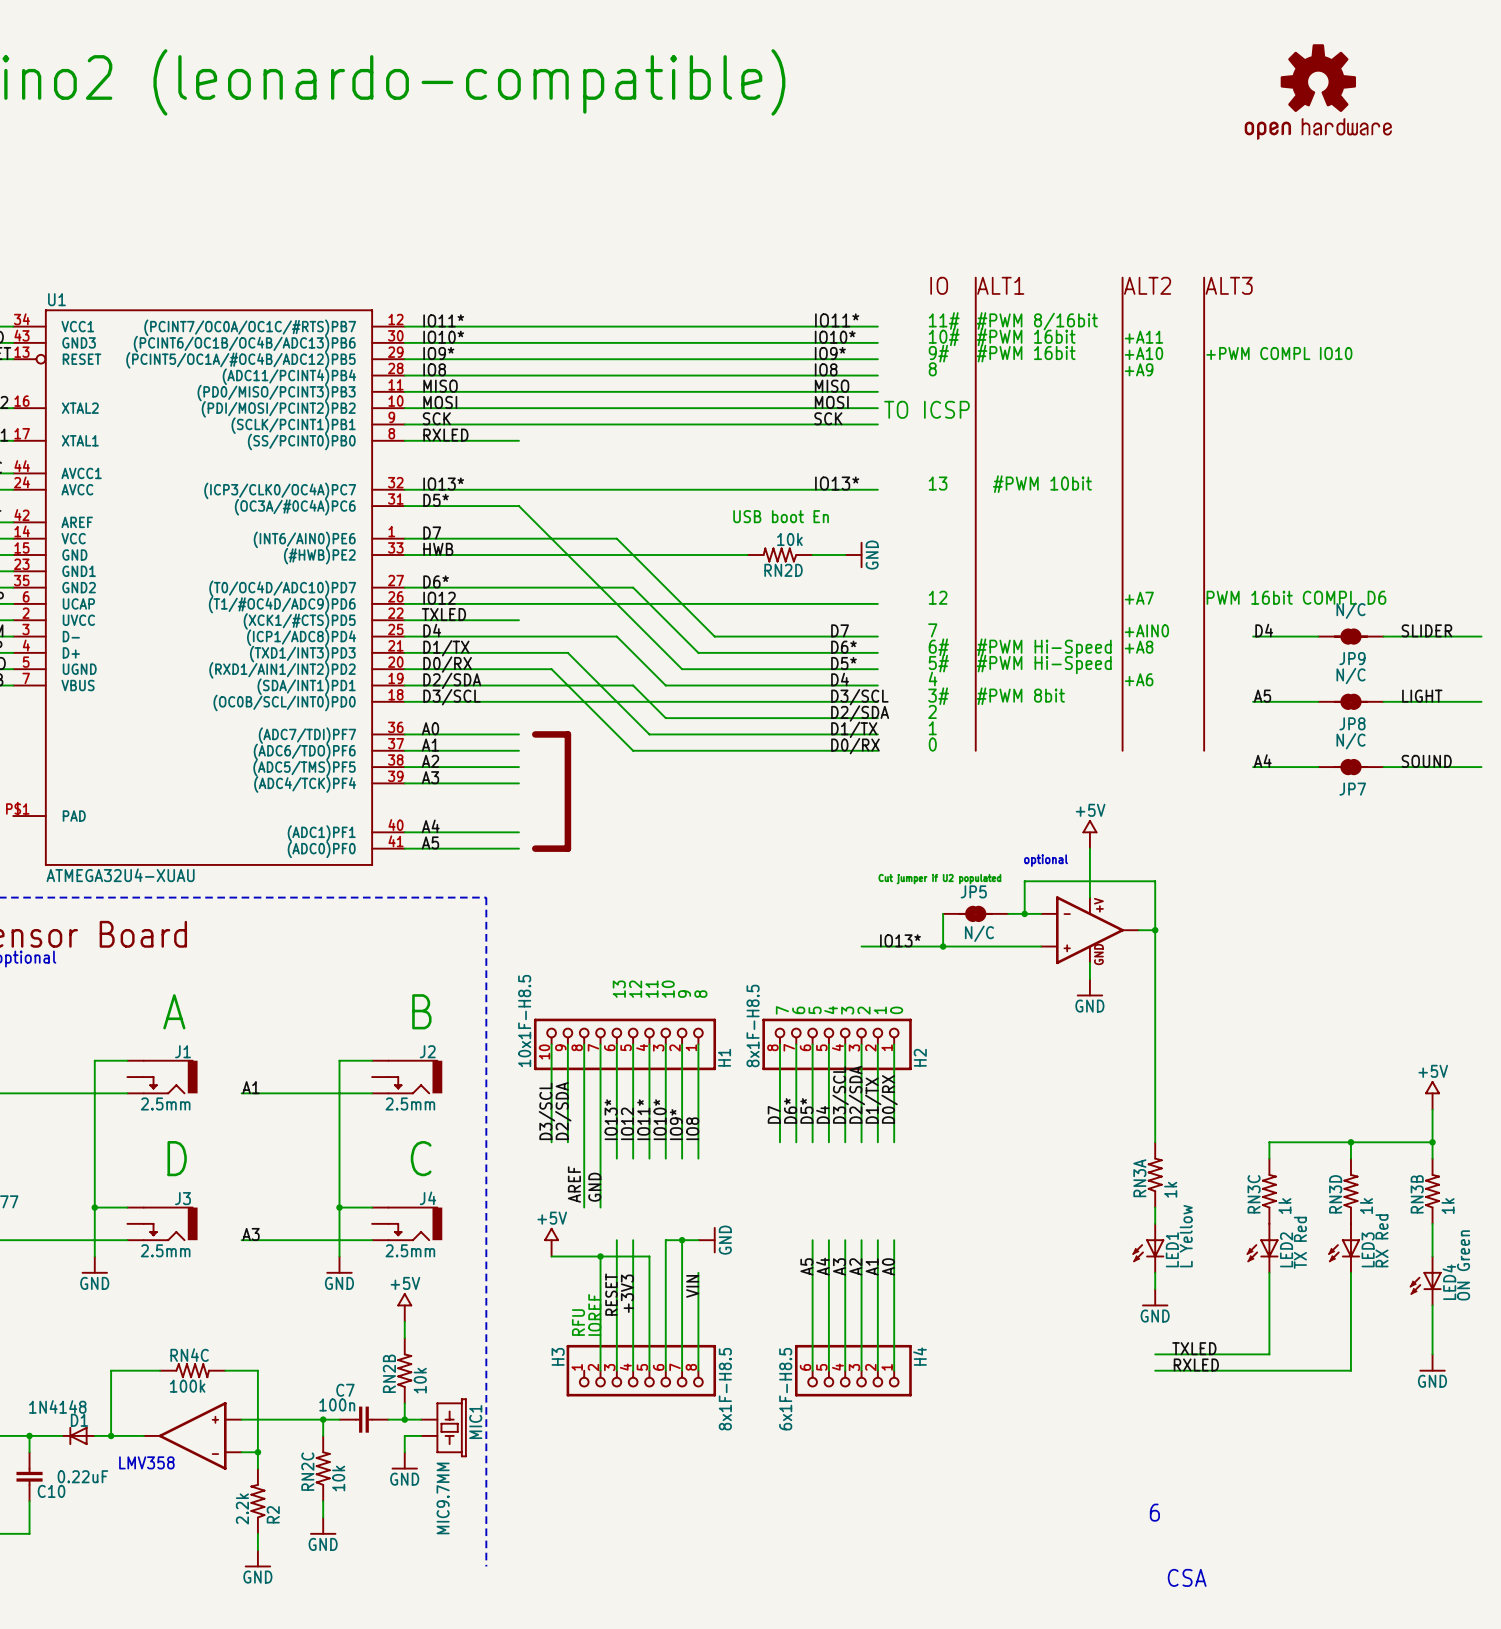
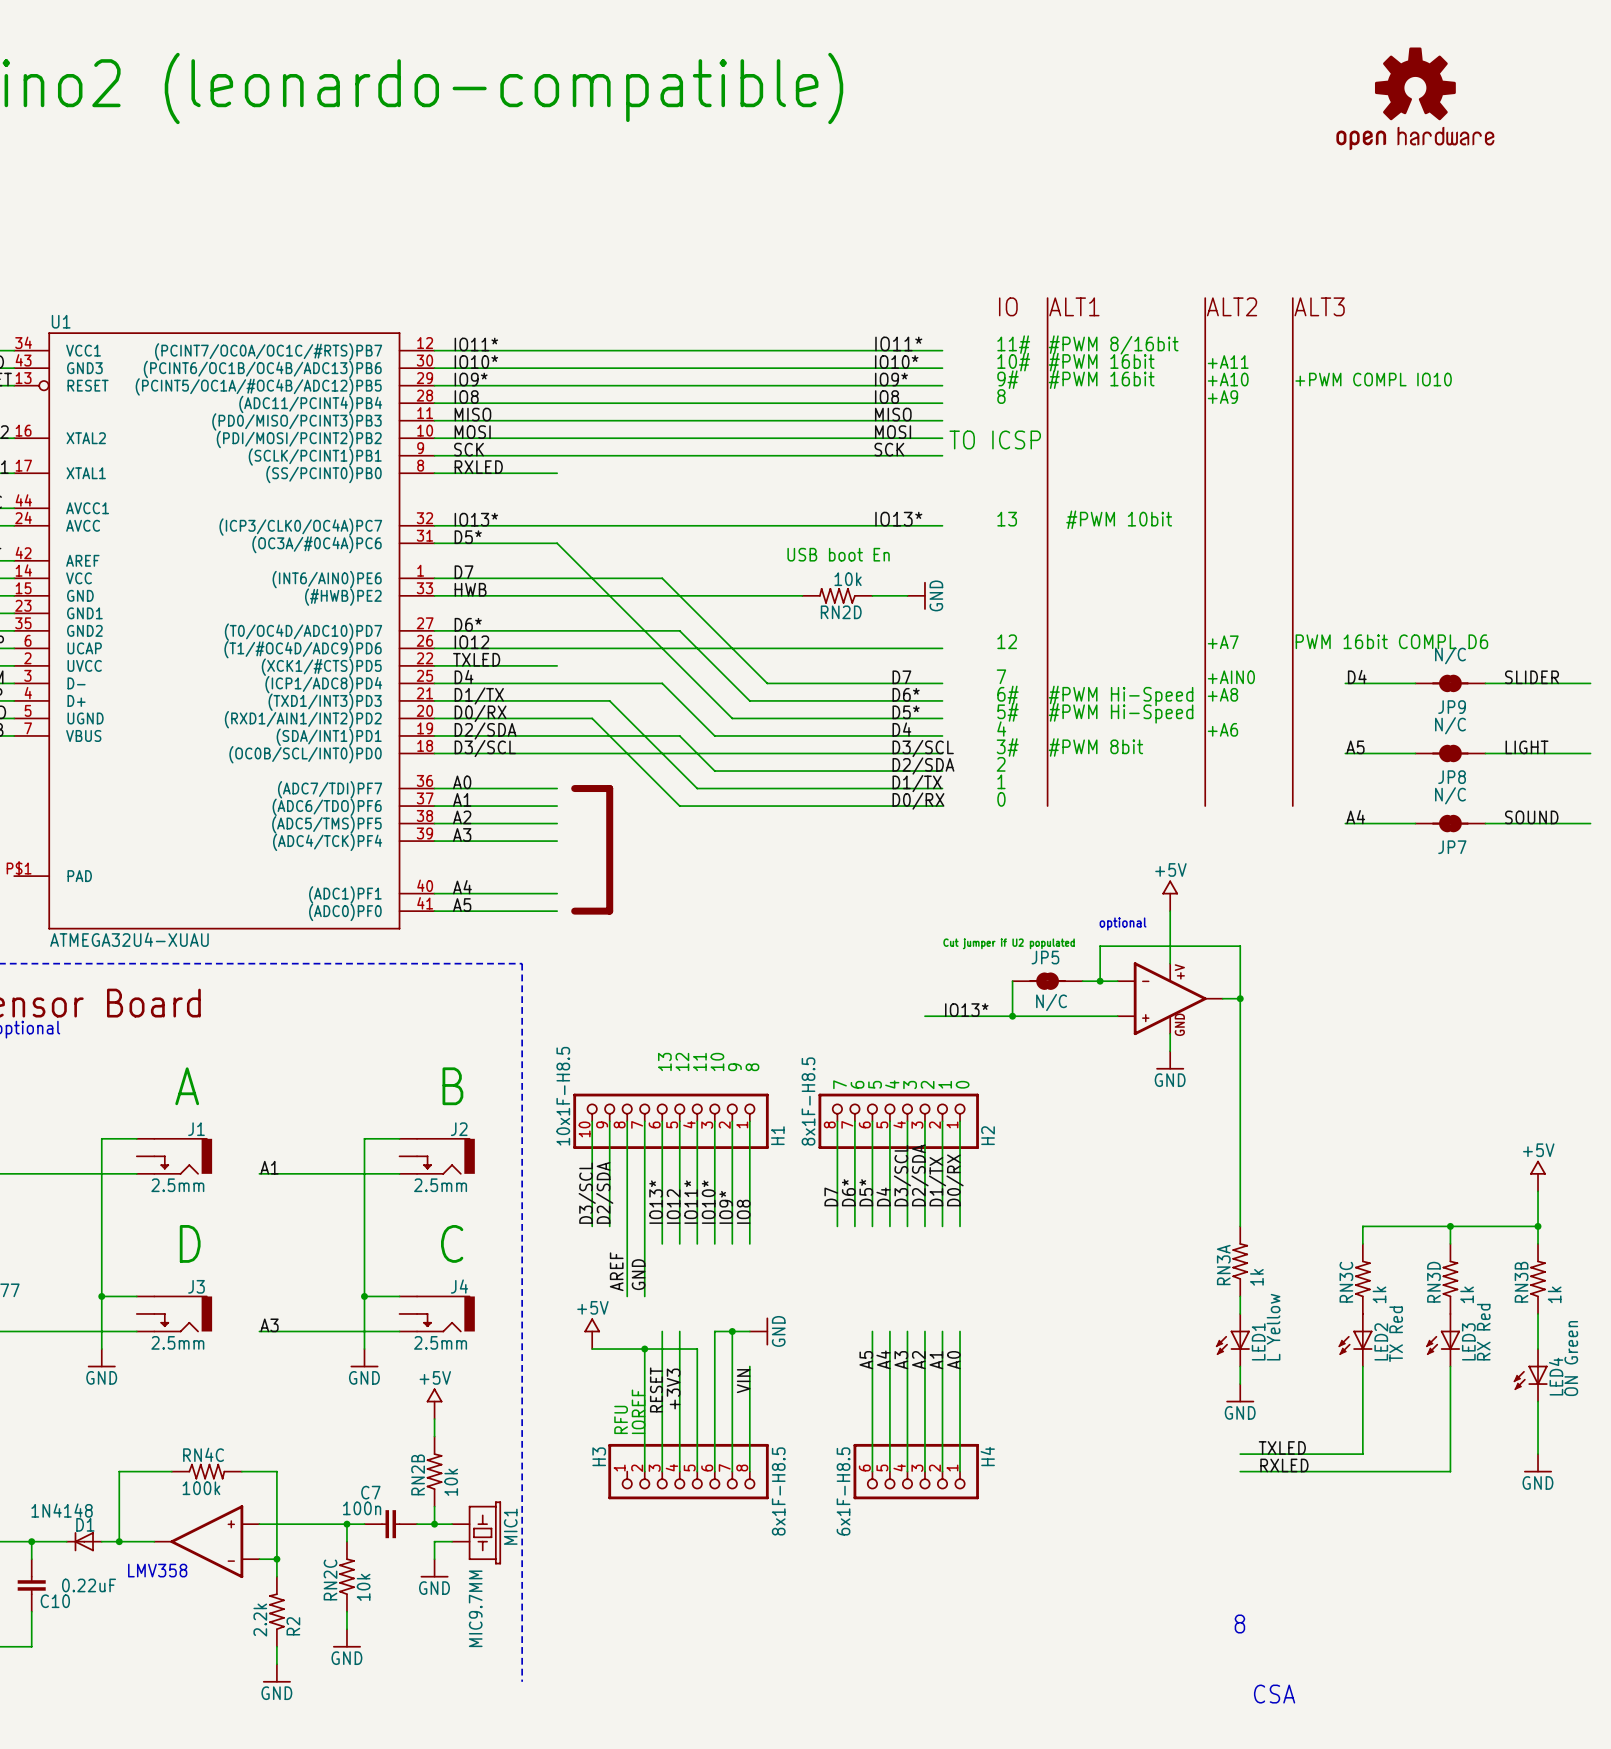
text: 6 (1154, 1512) -> 8 (1239, 1623)

